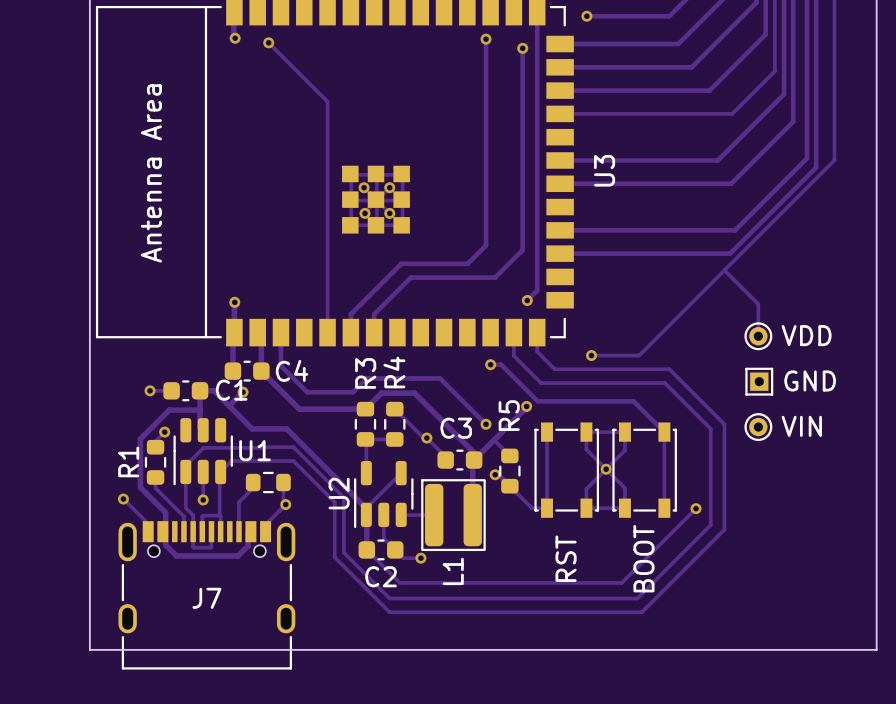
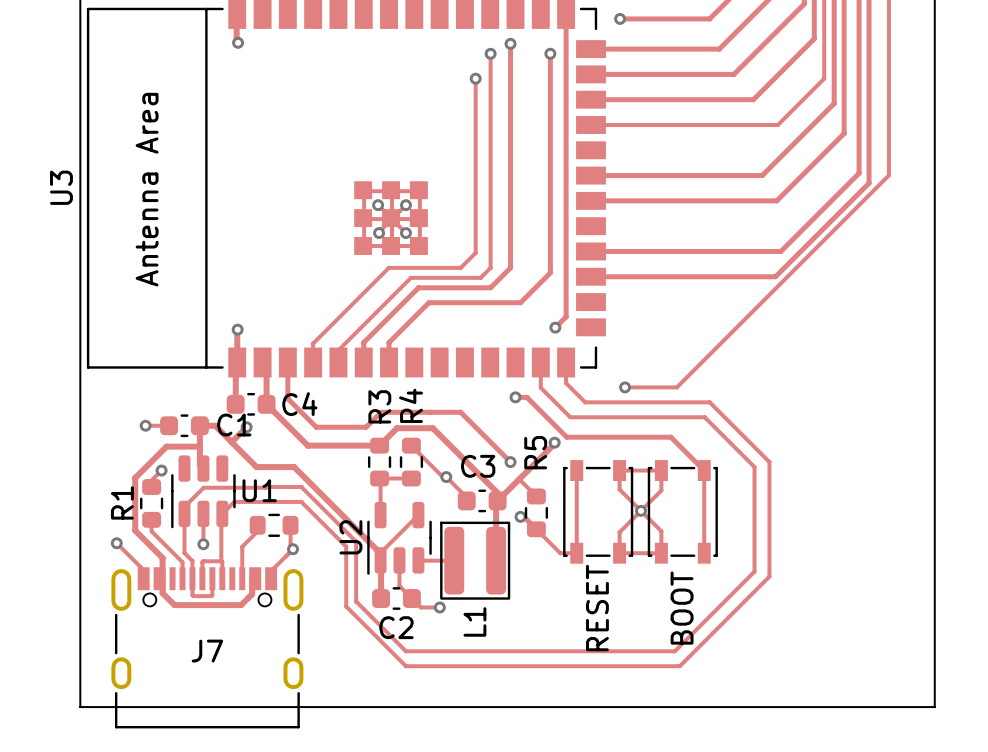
track: (268, 42) (327, 101) (327, 321) -> (490, 53) (490, 267) (480, 277) (410, 277) (338, 350)
via: (268, 42) -> none
via: none -> (490, 53)
track: none -> (475, 78) (475, 252) (460, 267) (388, 267) (313, 343) (313, 362)
via: none -> (475, 78)
U3 name position: U3 (604, 170) -> U3 (61, 187)
track: (724, 270) (758, 304) (758, 336) -> none
part: (758, 336) -> none
part: (759, 381) -> none
part: (758, 427) -> none
track: (696, 508) (621, 582) (399, 582) (366, 549) -> none
via: (696, 508) -> none
part value: RST (566, 558) -> RESET (597, 608)

